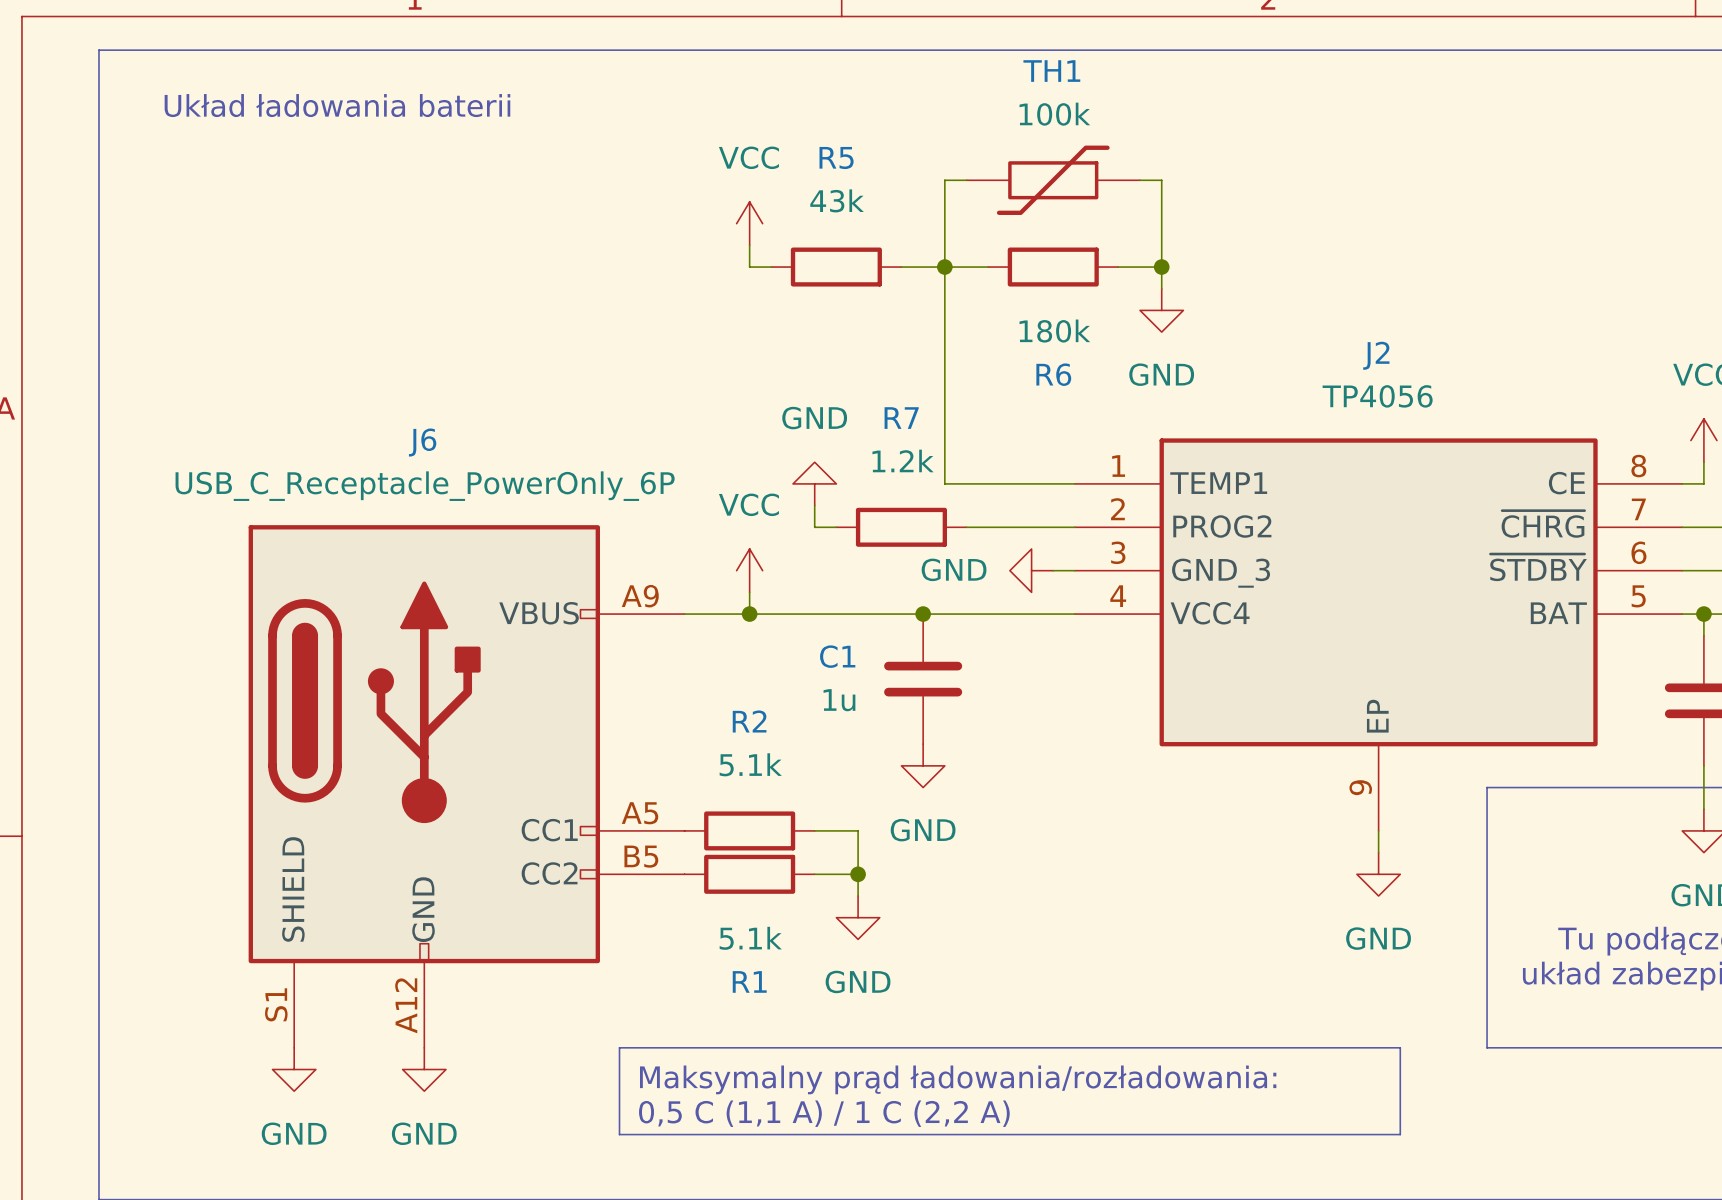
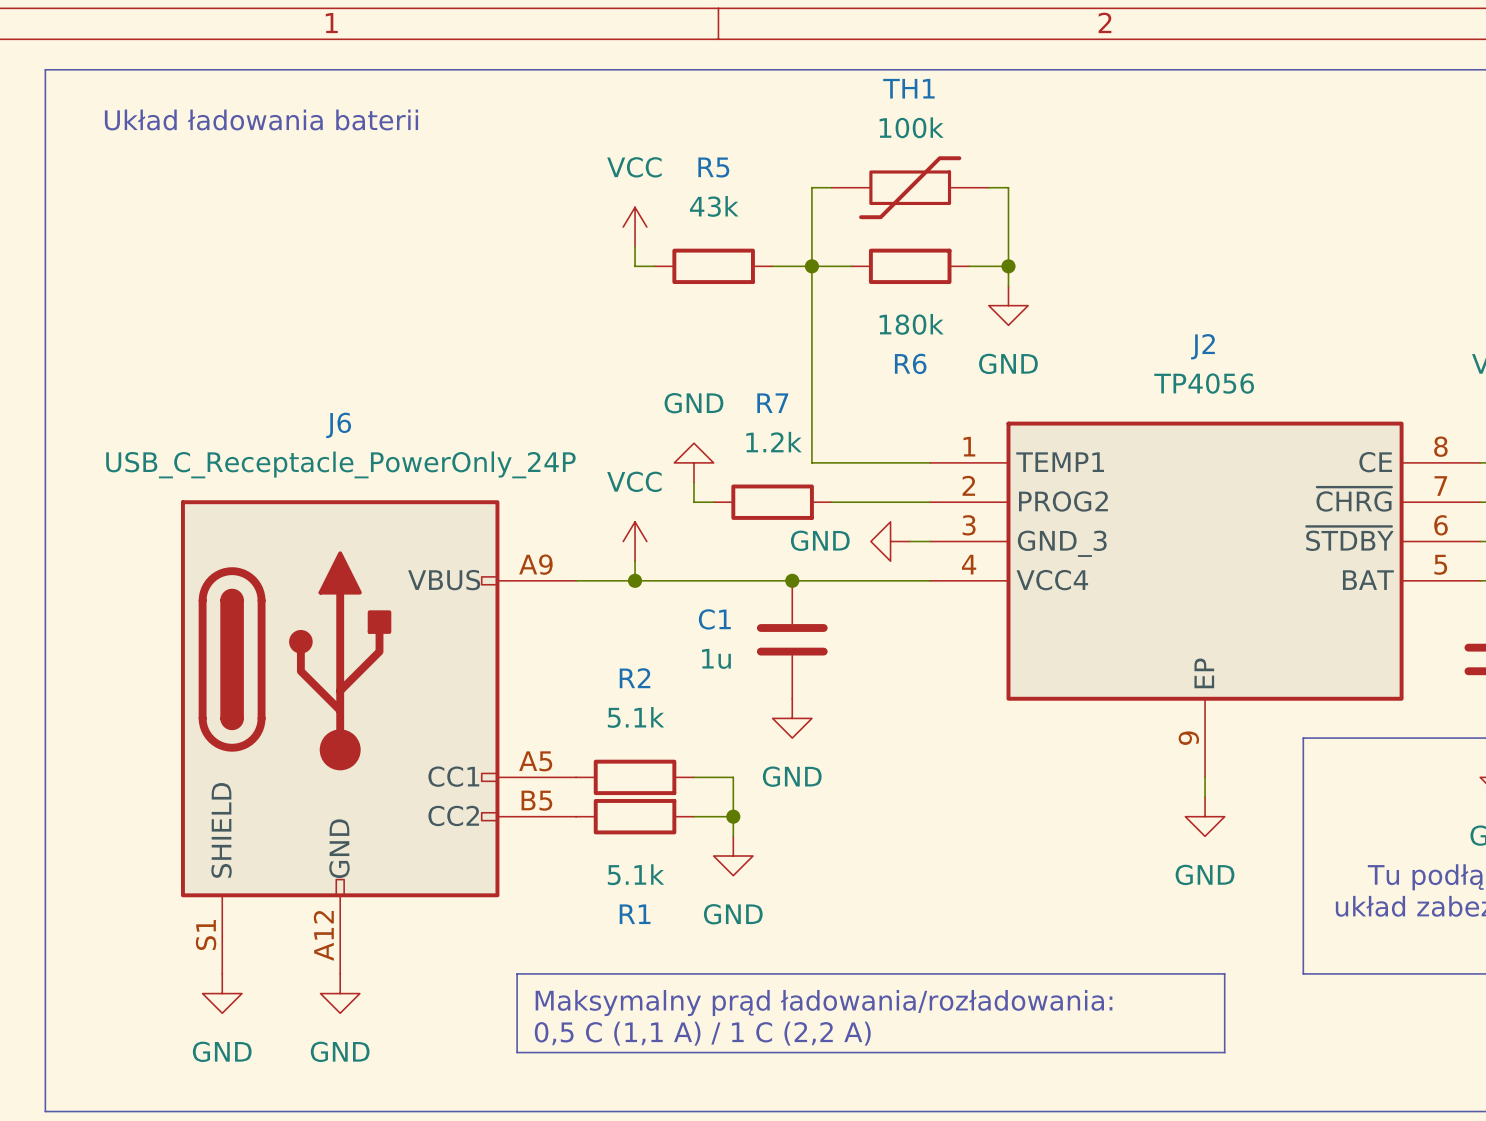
J6 value: USB_C_Receptacle_PowerOnly_6P (425, 486) -> USB_C_Receptacle_PowerOnly_24P (340, 464)

